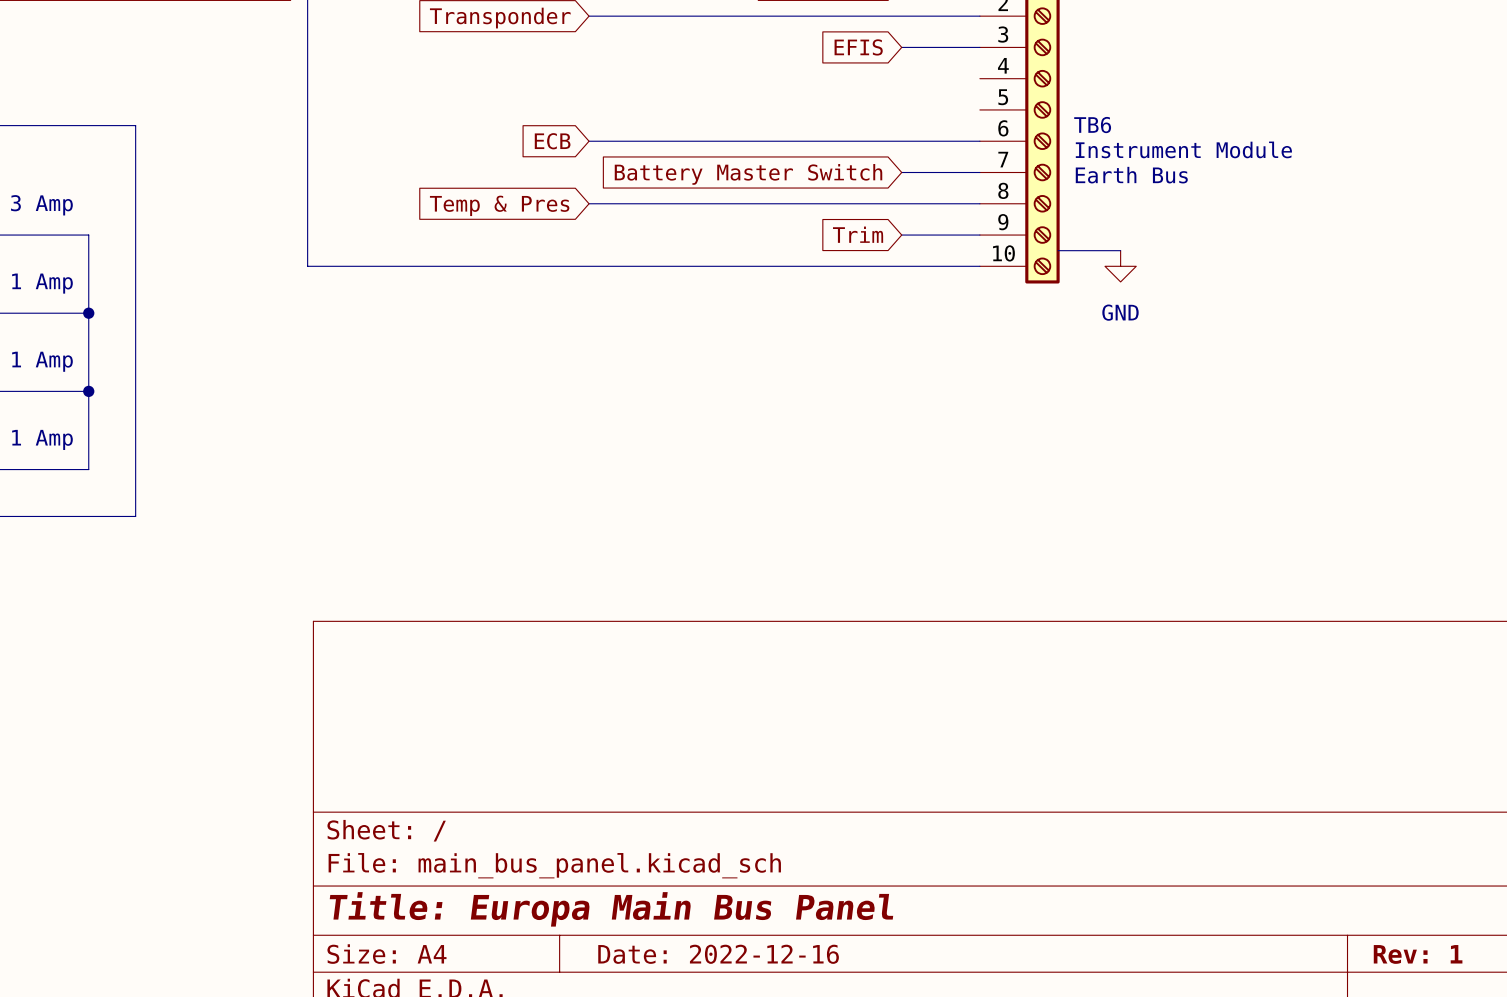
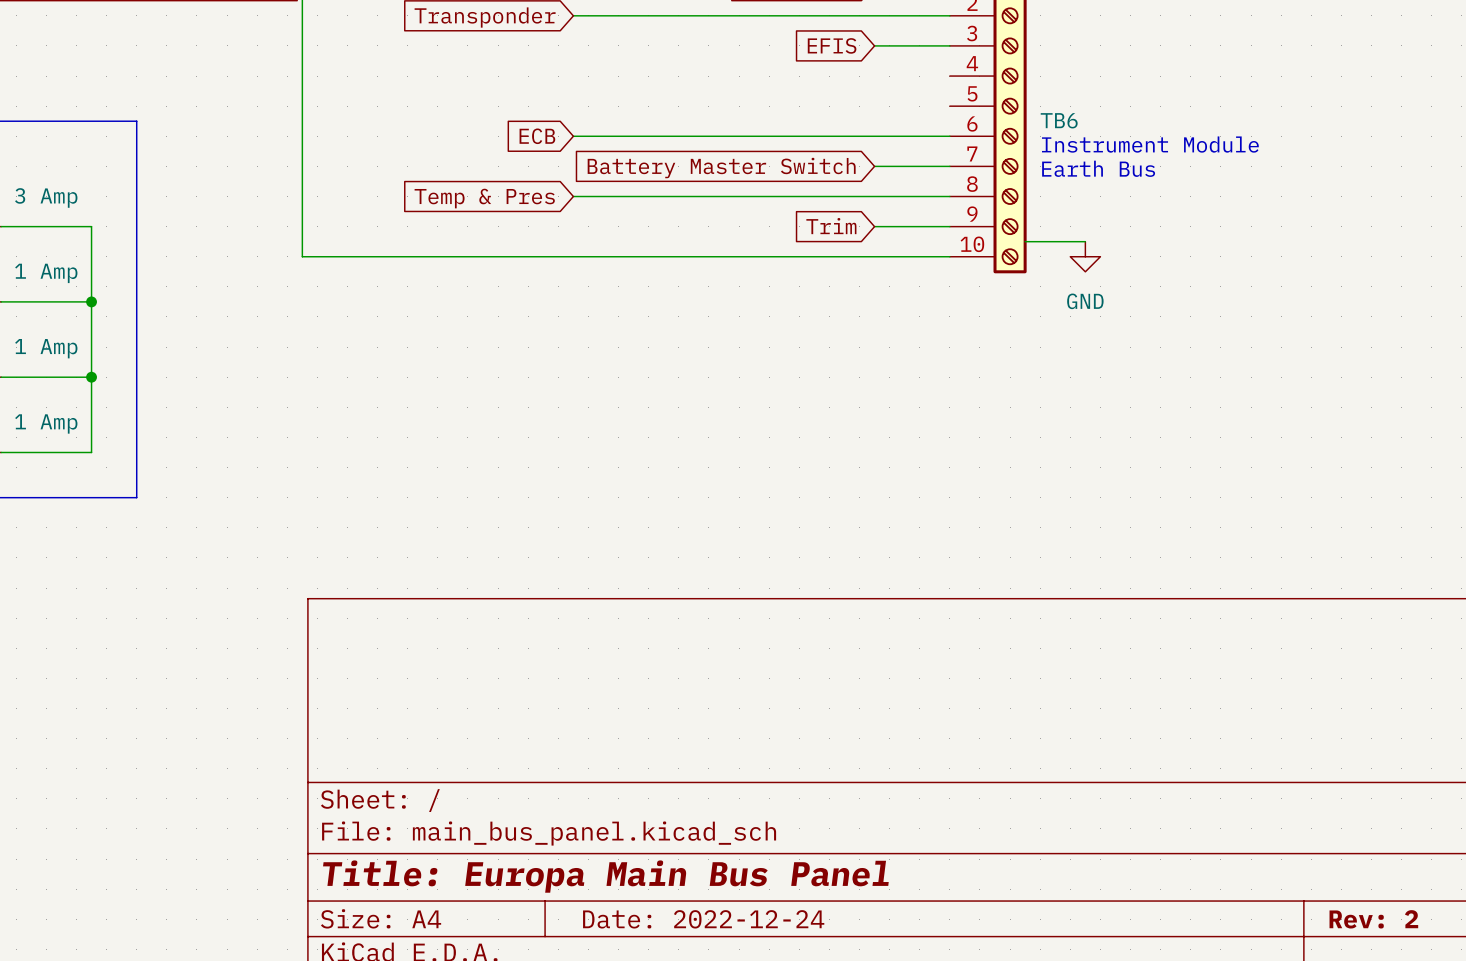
title block: Date: 2022-12-16 (718, 954) -> Date: 2022-12-24 (703, 919)
title block: Rev: 1 (1418, 954) -> Rev: 2 (1373, 919)

